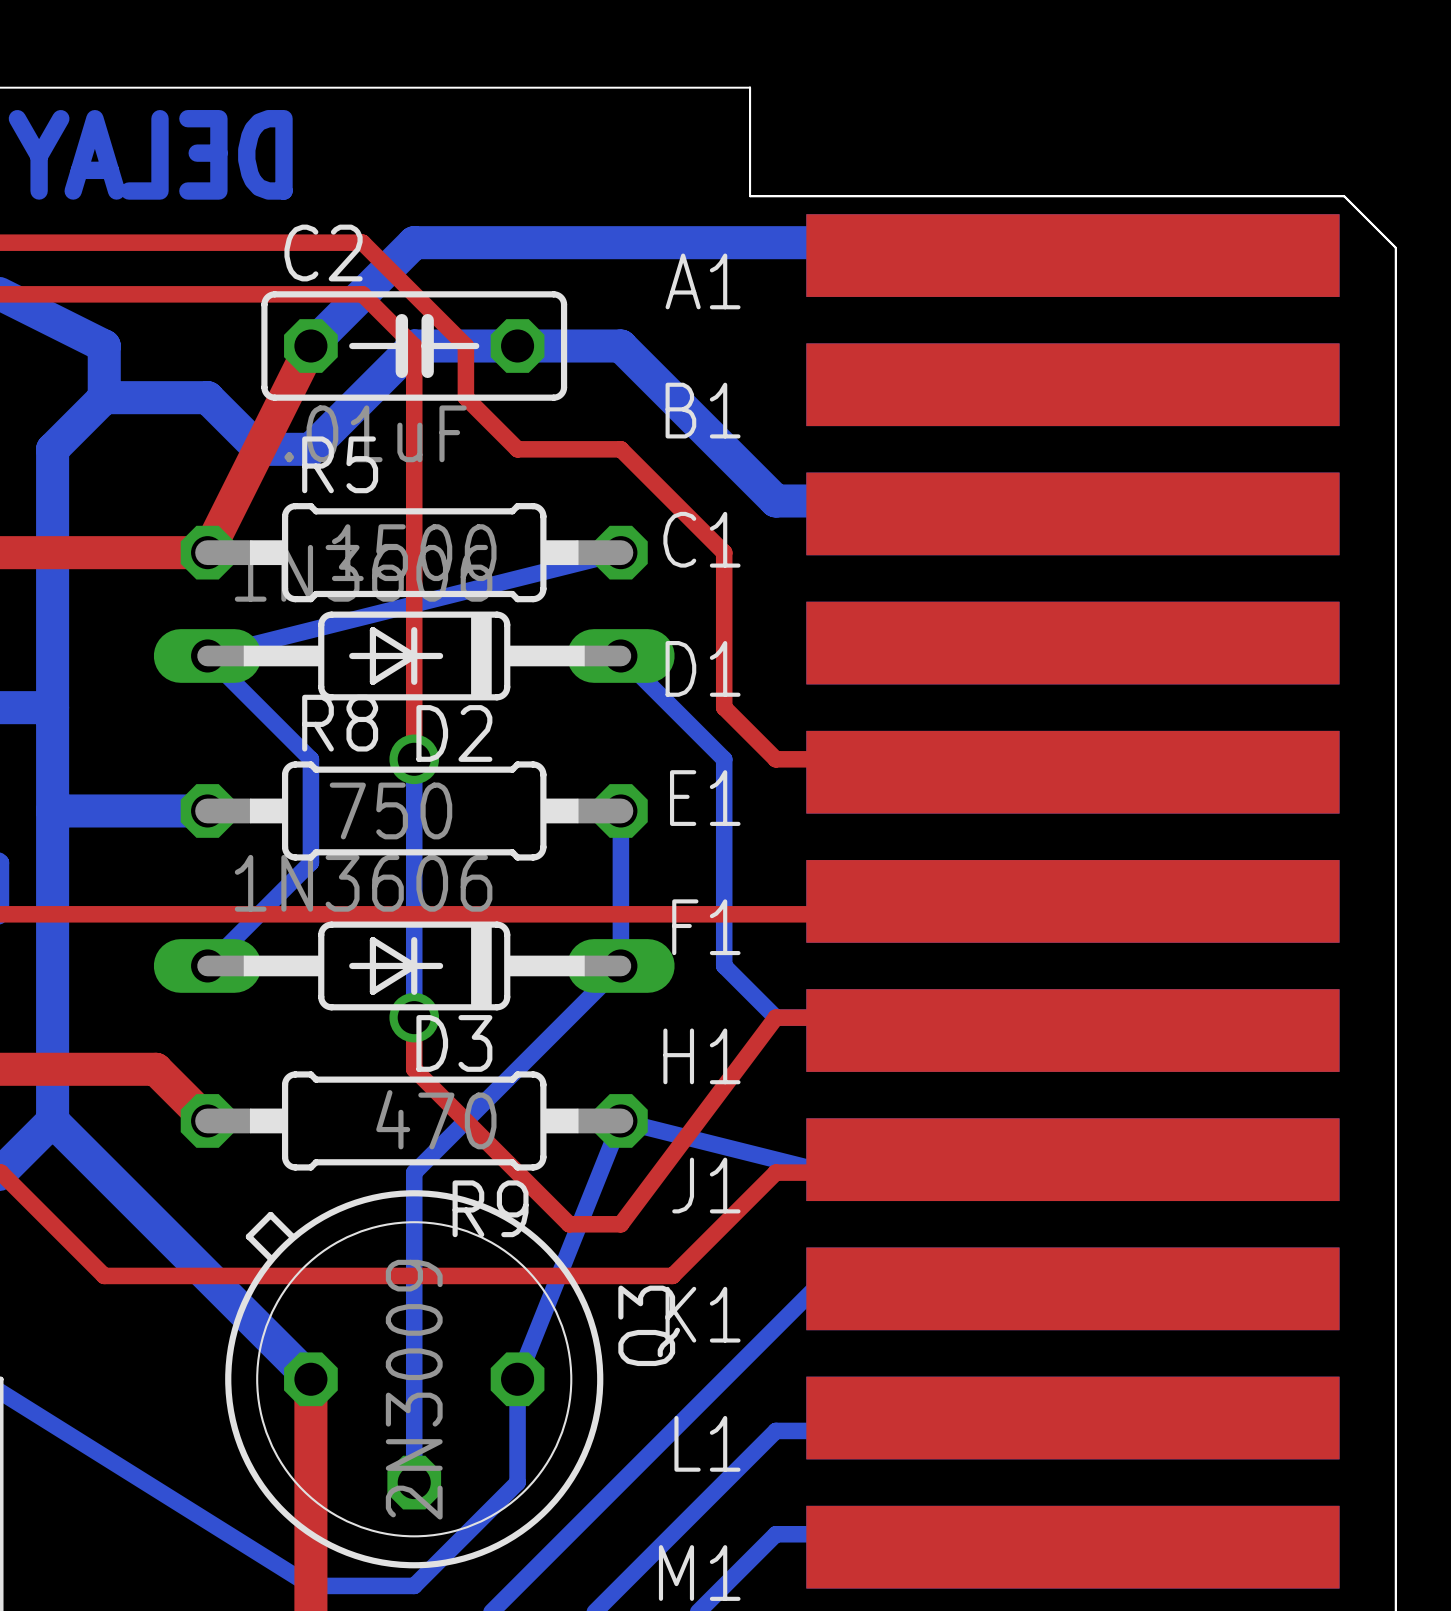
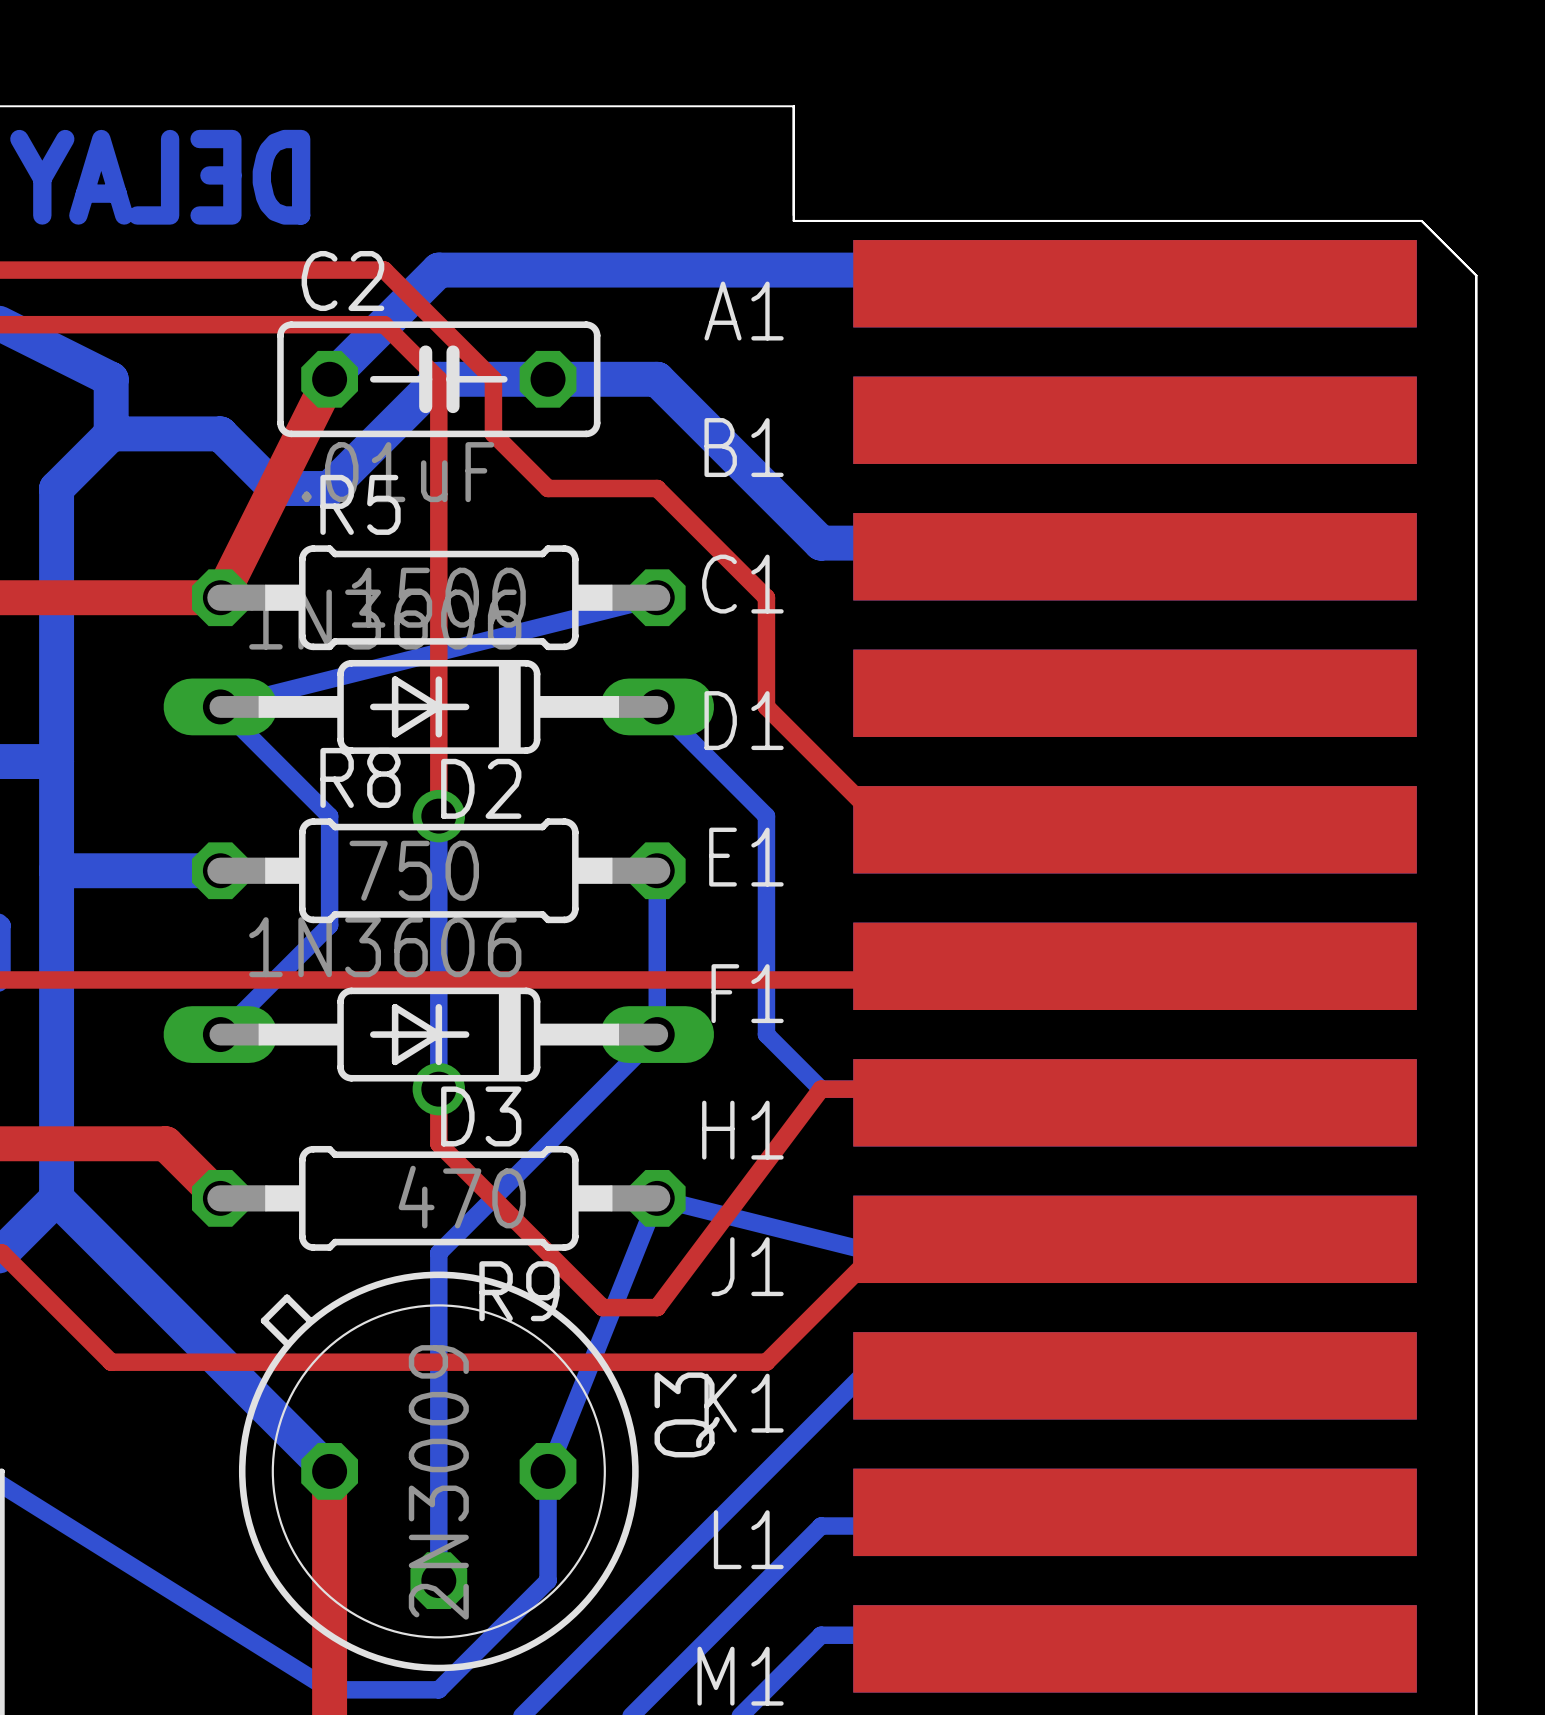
top track: (724, 655) (724, 707) (775, 759) (827, 759) -> (766, 706) (875, 816)
top track: (827, 1172) (775, 1172) (672, 1275) -> (875, 1252) (766, 1362) (711, 1362)

